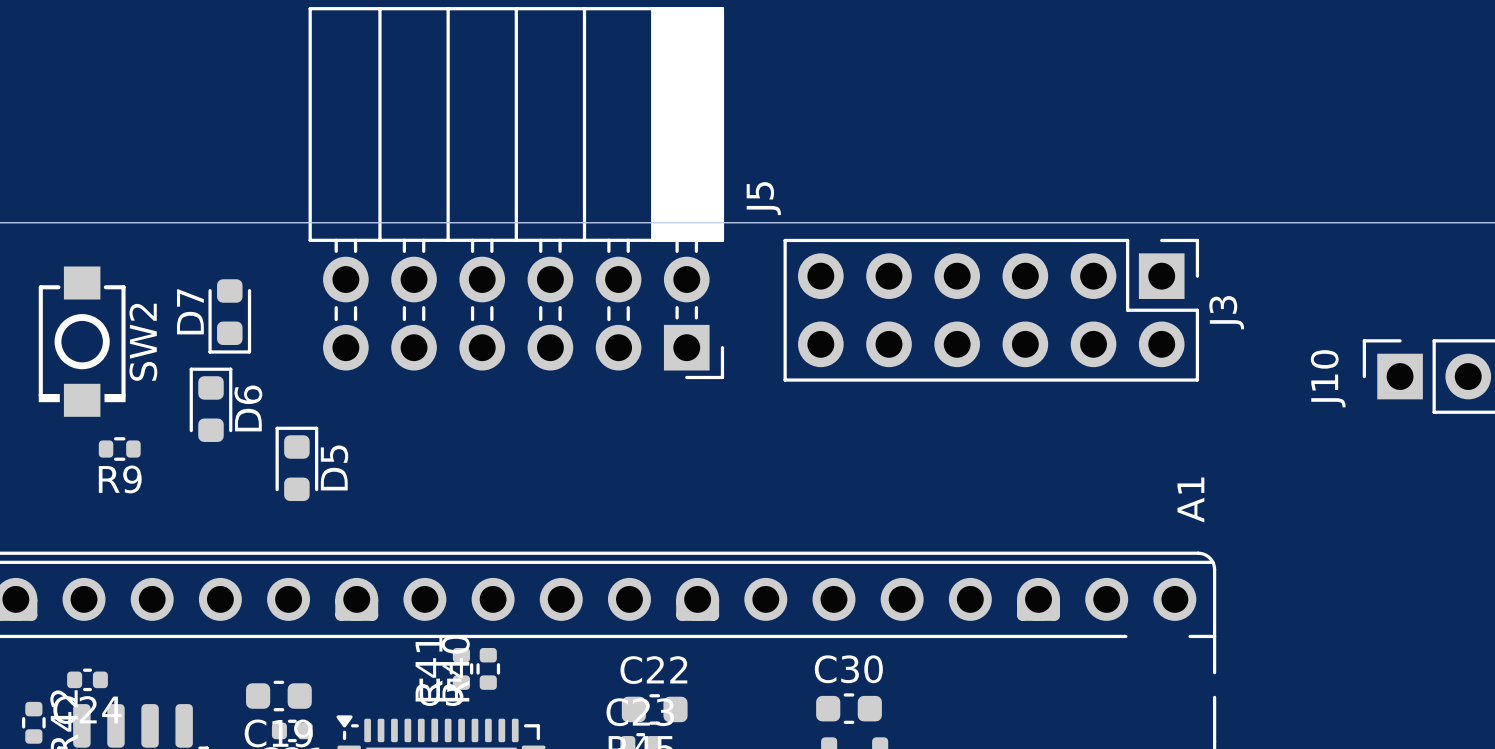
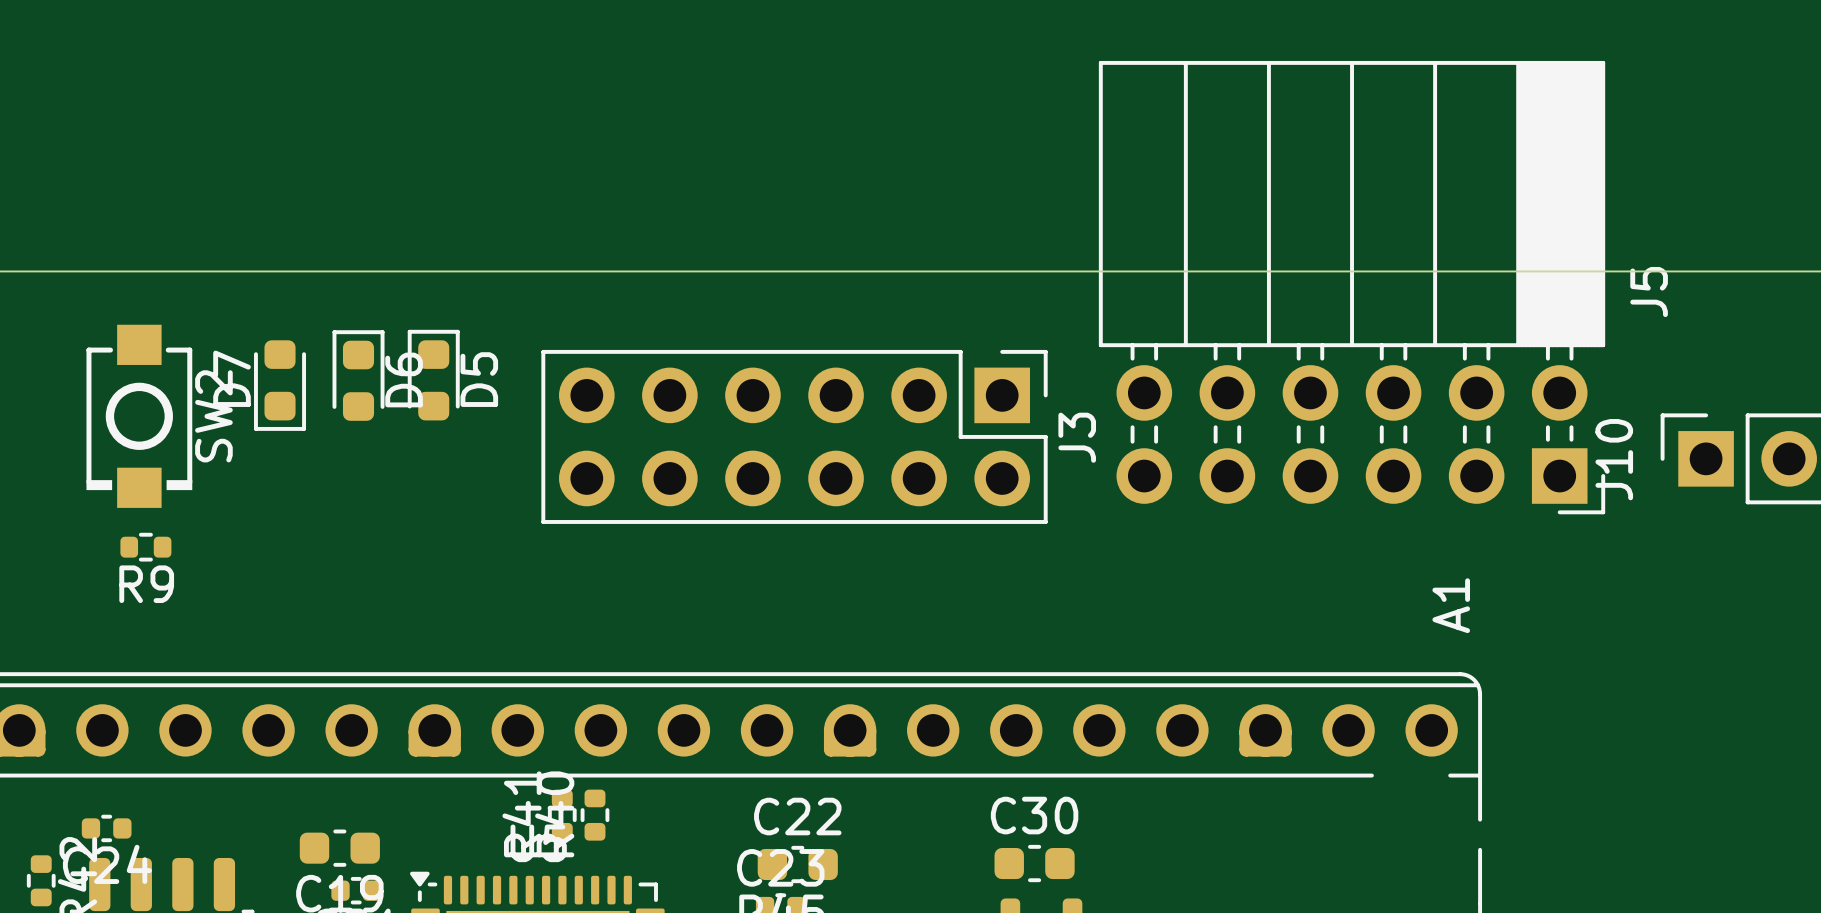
J5 position: (516, 193) -> (1352, 287)
J3 position: (991, 310) -> (794, 436)
SW2 position: (82, 341) -> (139, 416)
D6 position: (211, 404) -> (358, 375)
D5 position: (296, 463) -> (433, 375)

